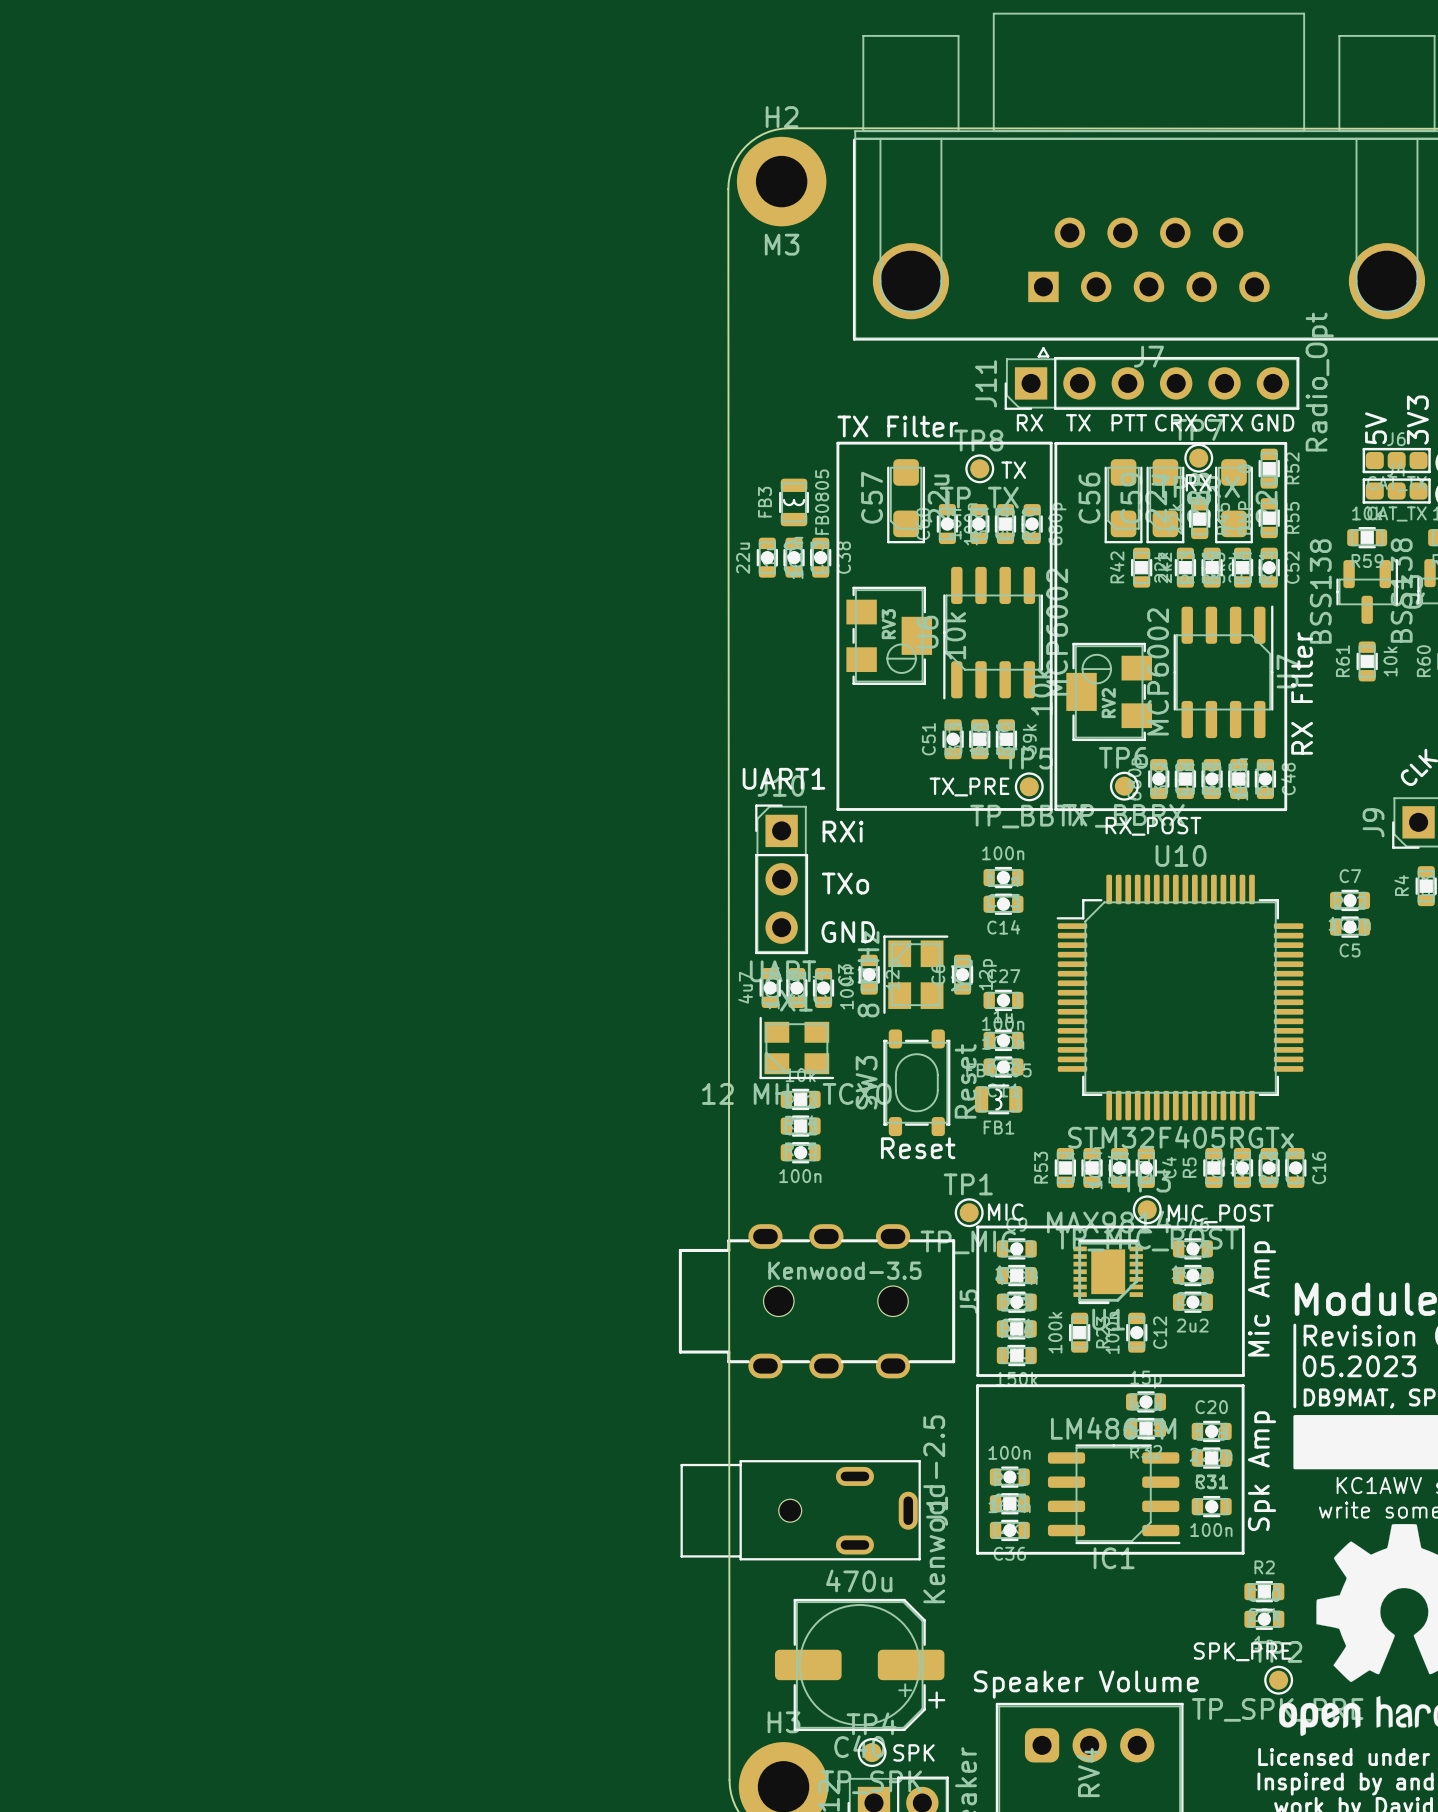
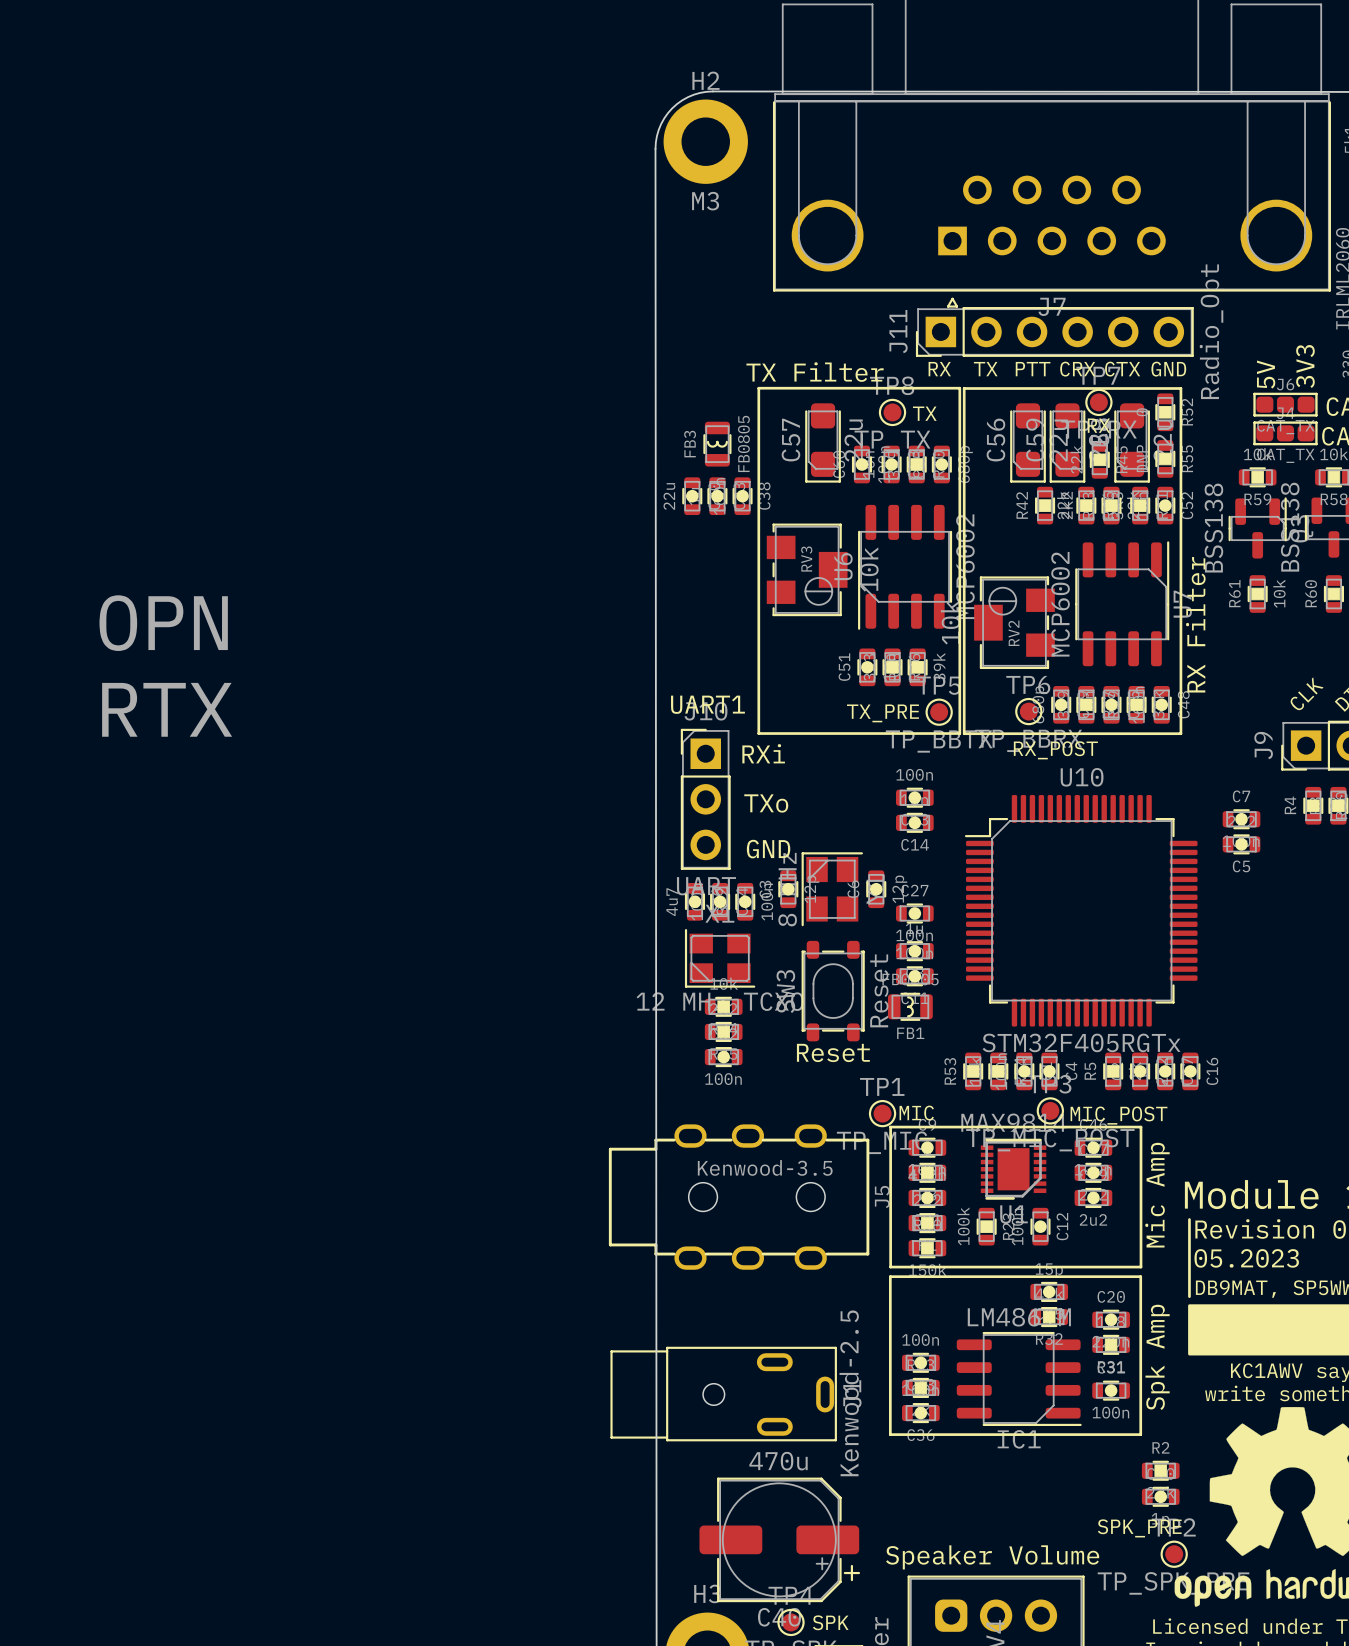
text: none -> OPN (163, 623)
text: none -> RTX (167, 709)

